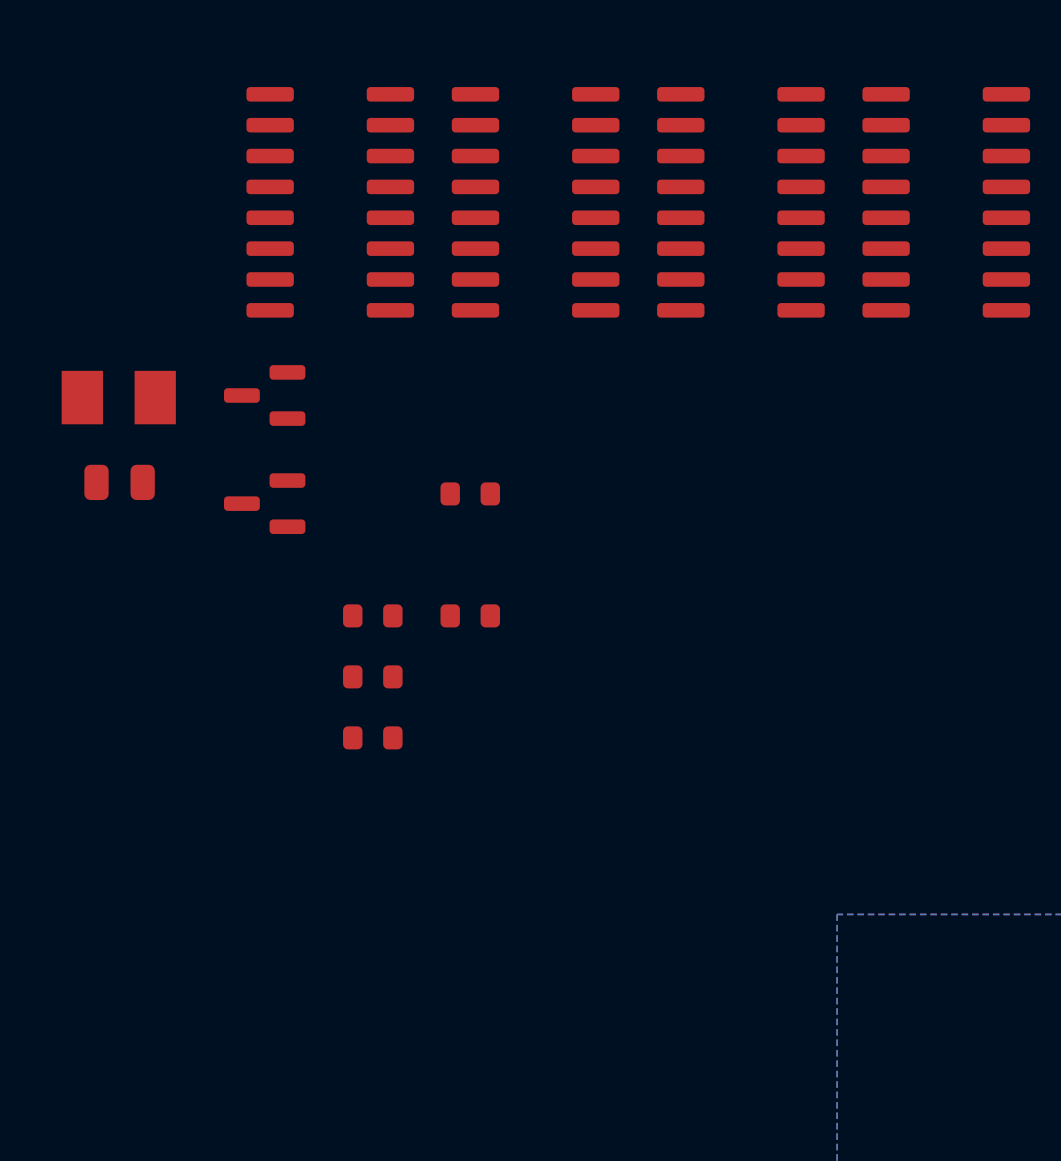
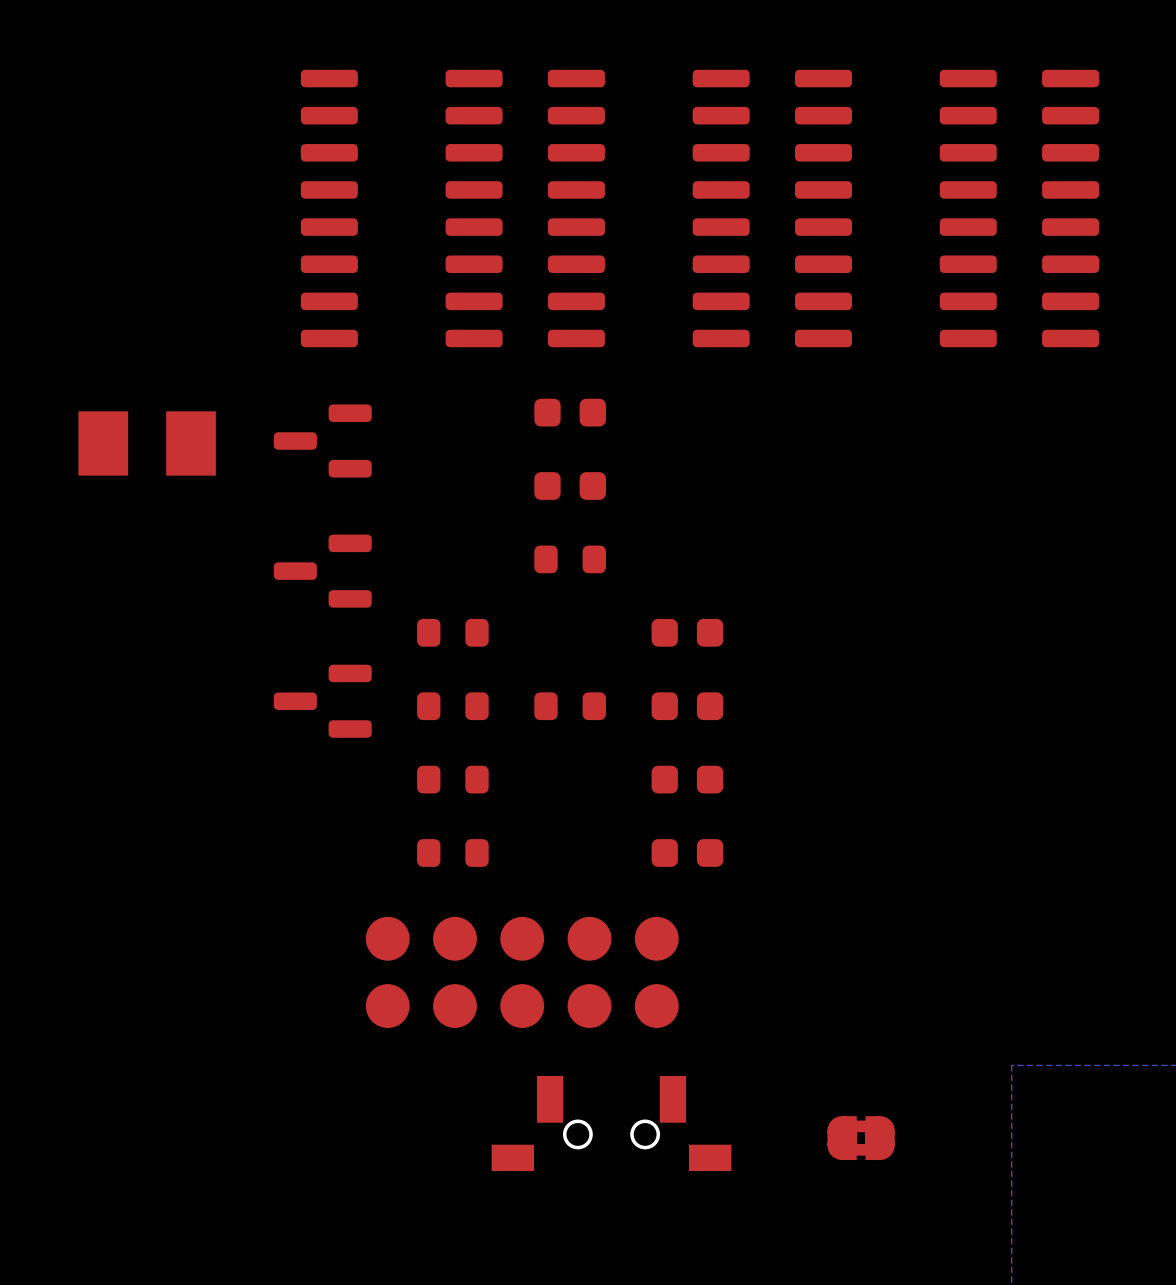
part: none -> (570, 412)
part: none -> (570, 486)
part: (119, 482) -> none
part: none -> (452, 632)
part: none -> (687, 632)
part: none -> (322, 701)
part: none -> (687, 706)
part: none -> (687, 779)
part: none -> (687, 853)
part: none -> (522, 972)
part: none -> (611, 1123)
part: none -> (861, 1138)

